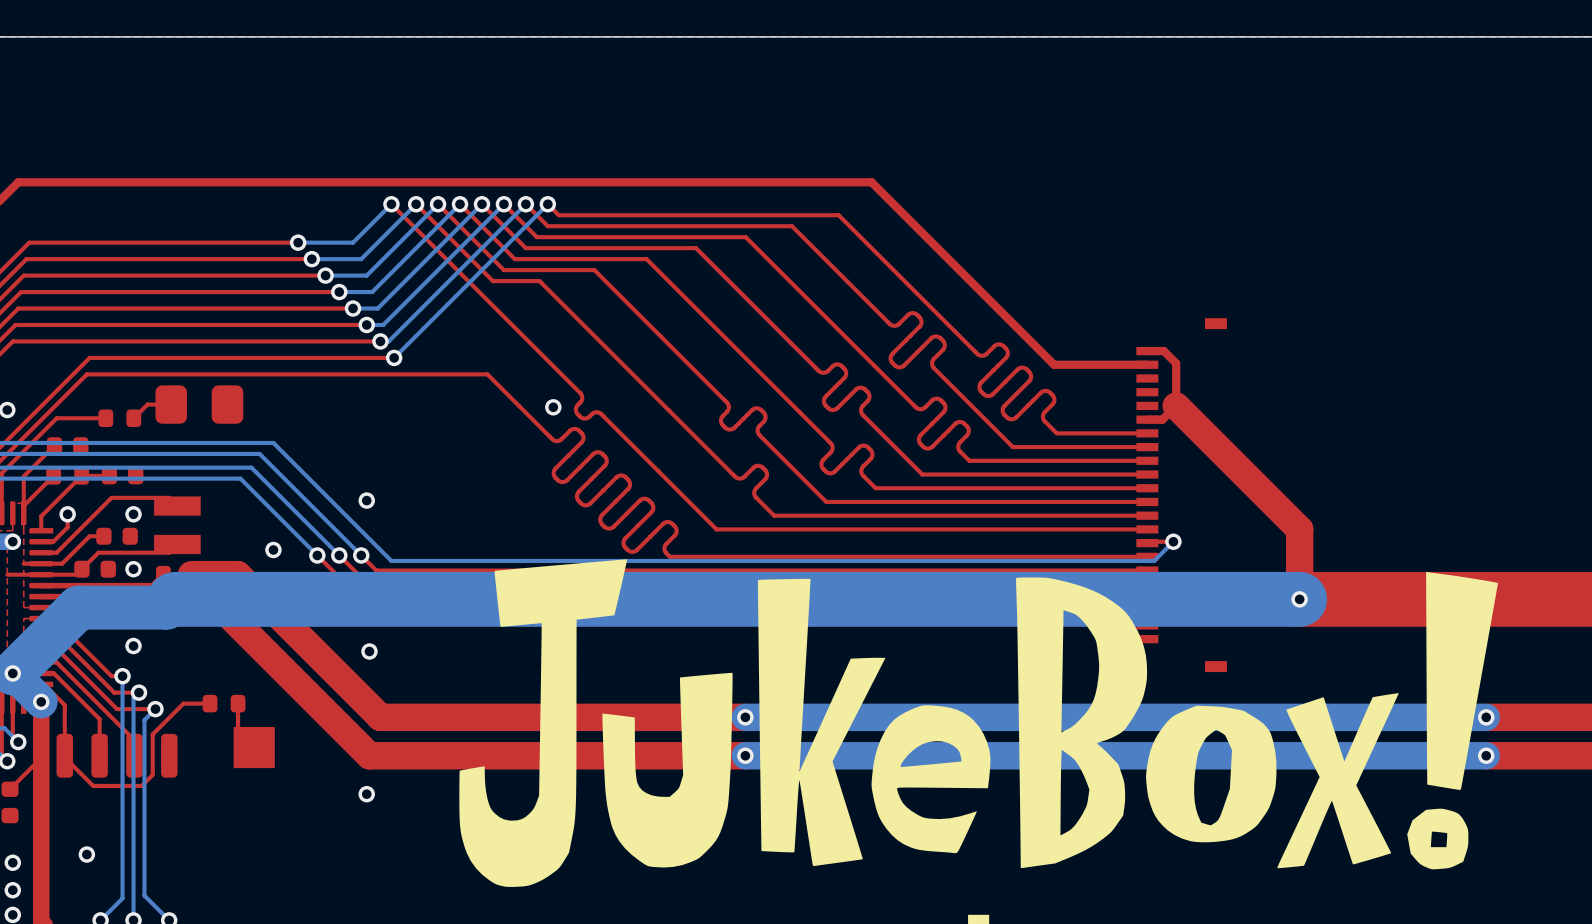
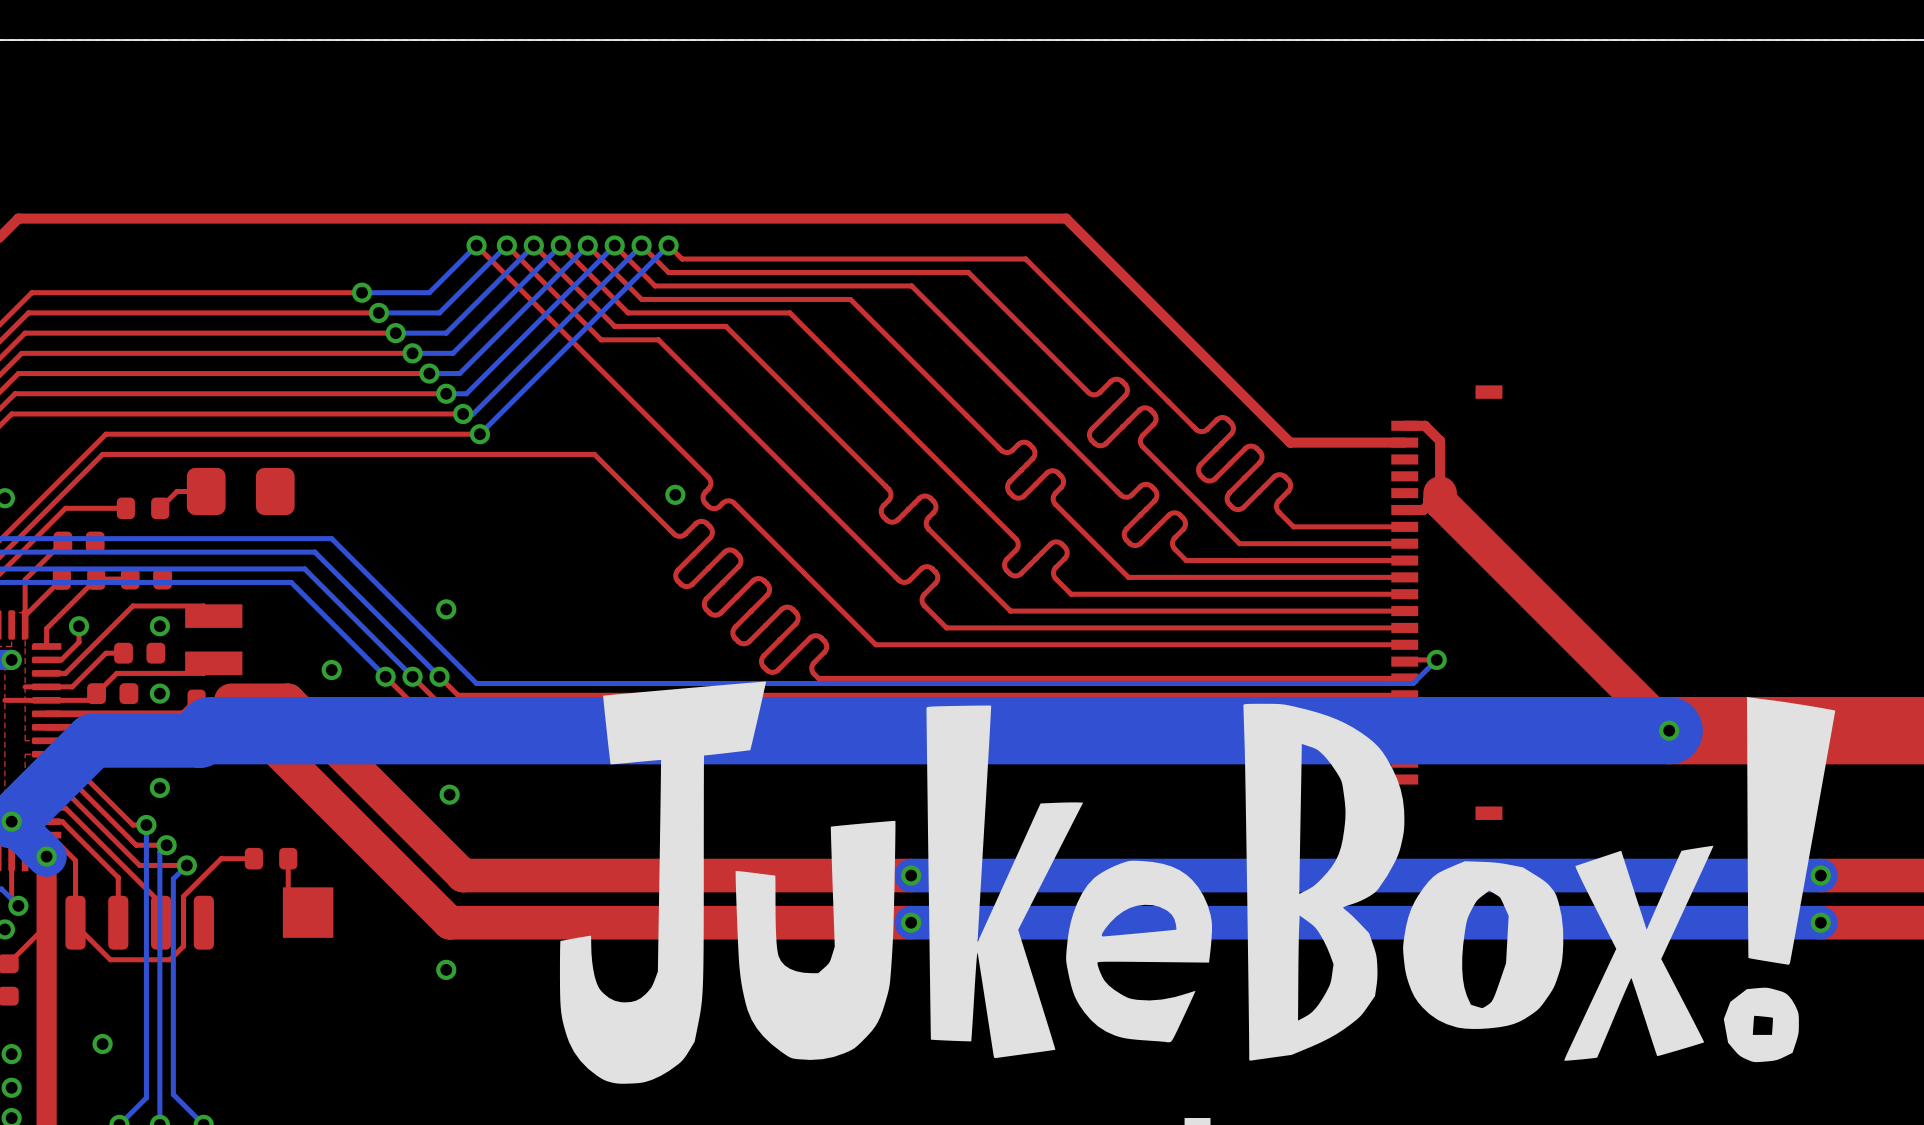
top track: (1176, 405) (1299, 529) (1299, 599) (1362, 599) -> (1440, 493) (1440, 501) (1669, 730)
via position: (1299, 599) -> (1669, 730)
bottom track: none -> (1669, 730) (1591, 730)

